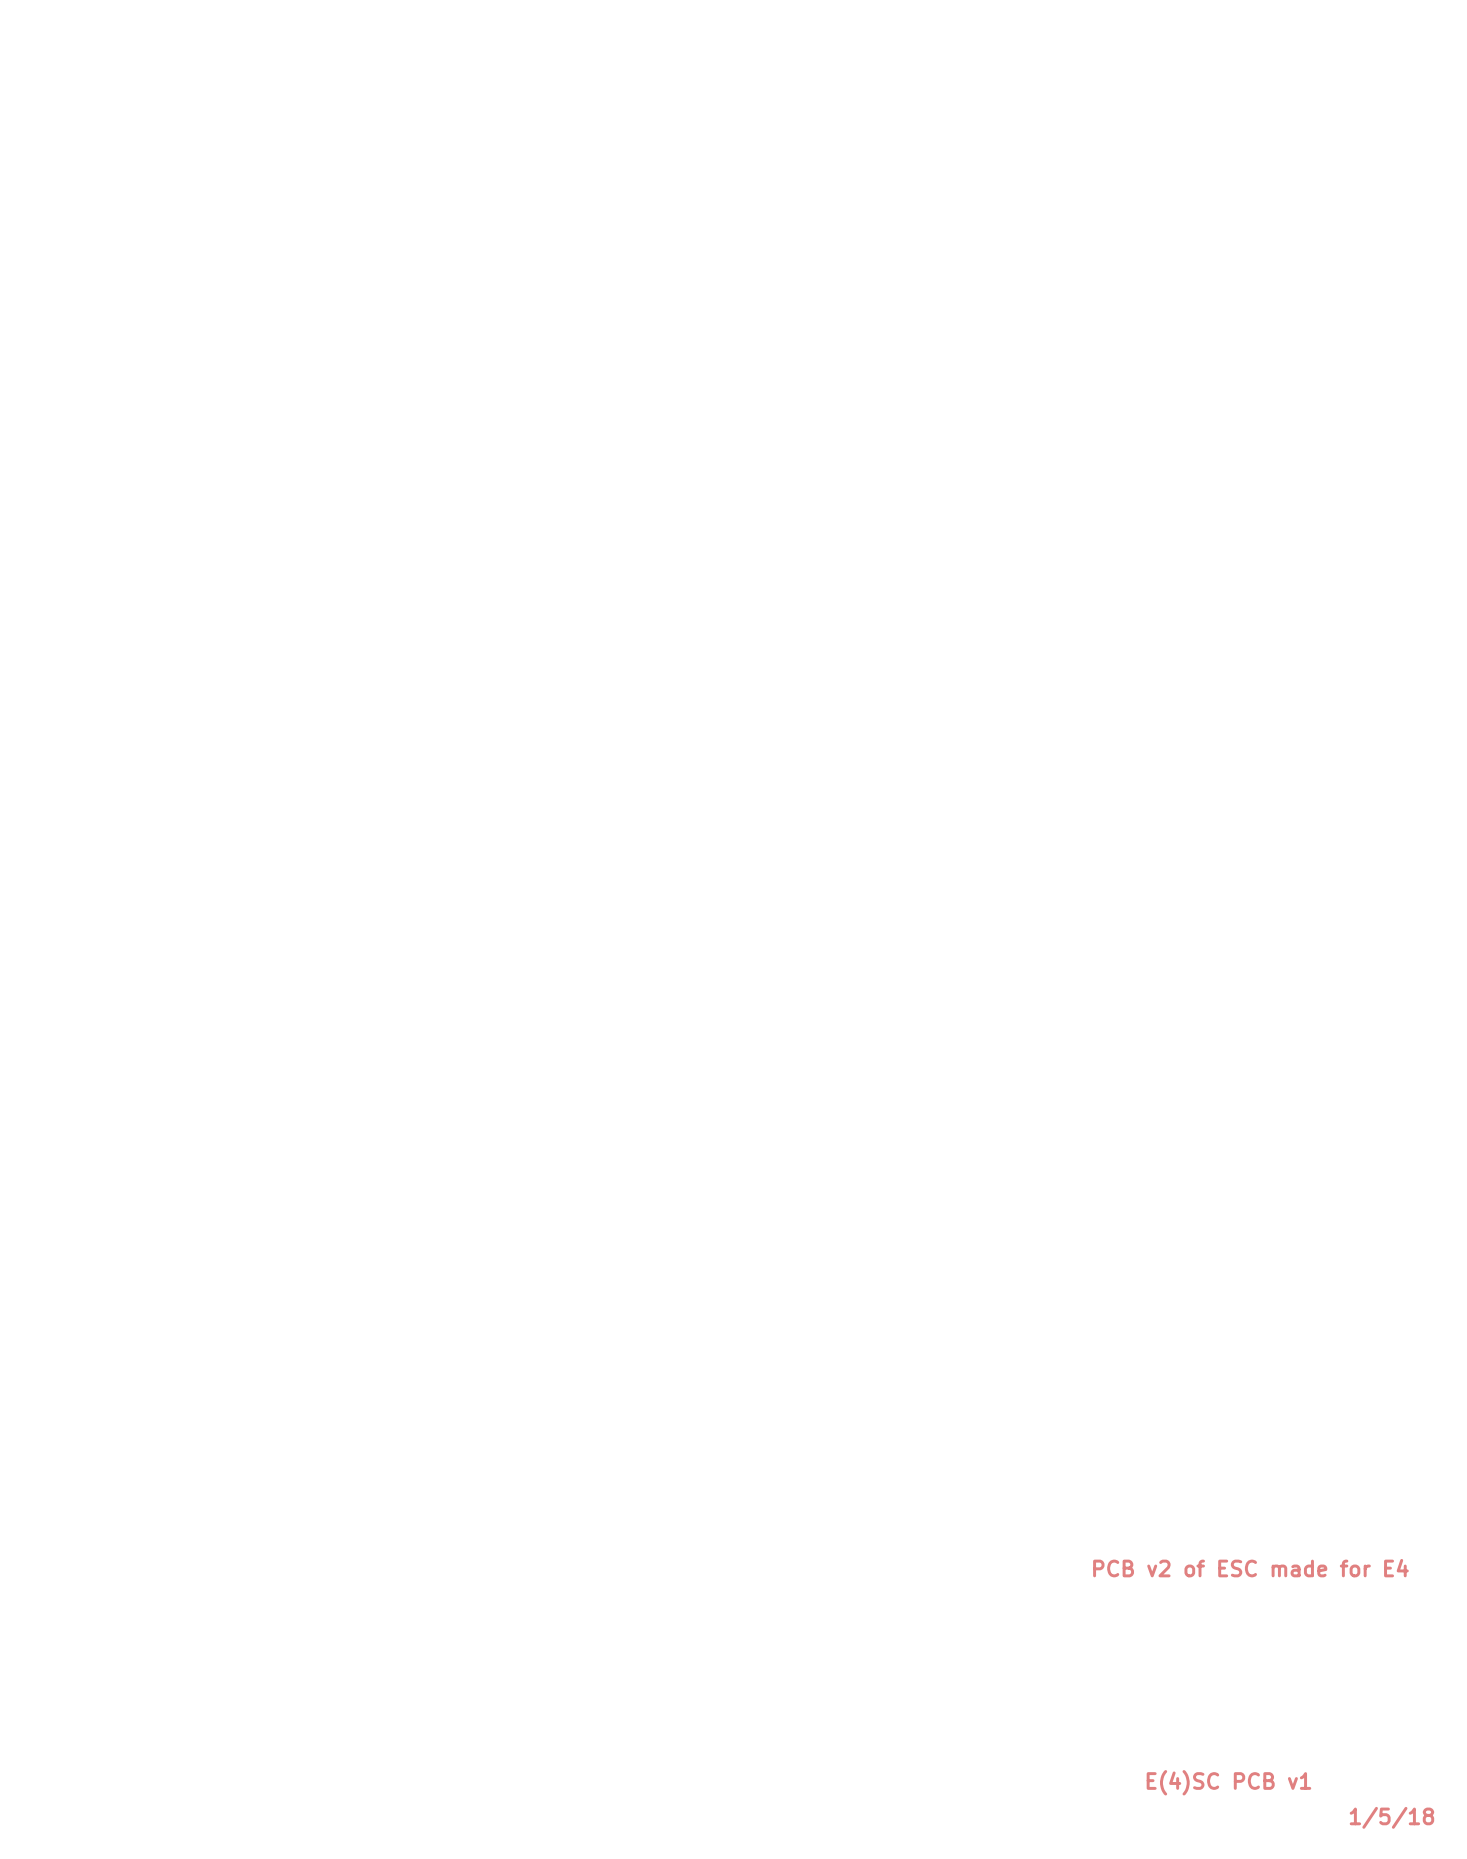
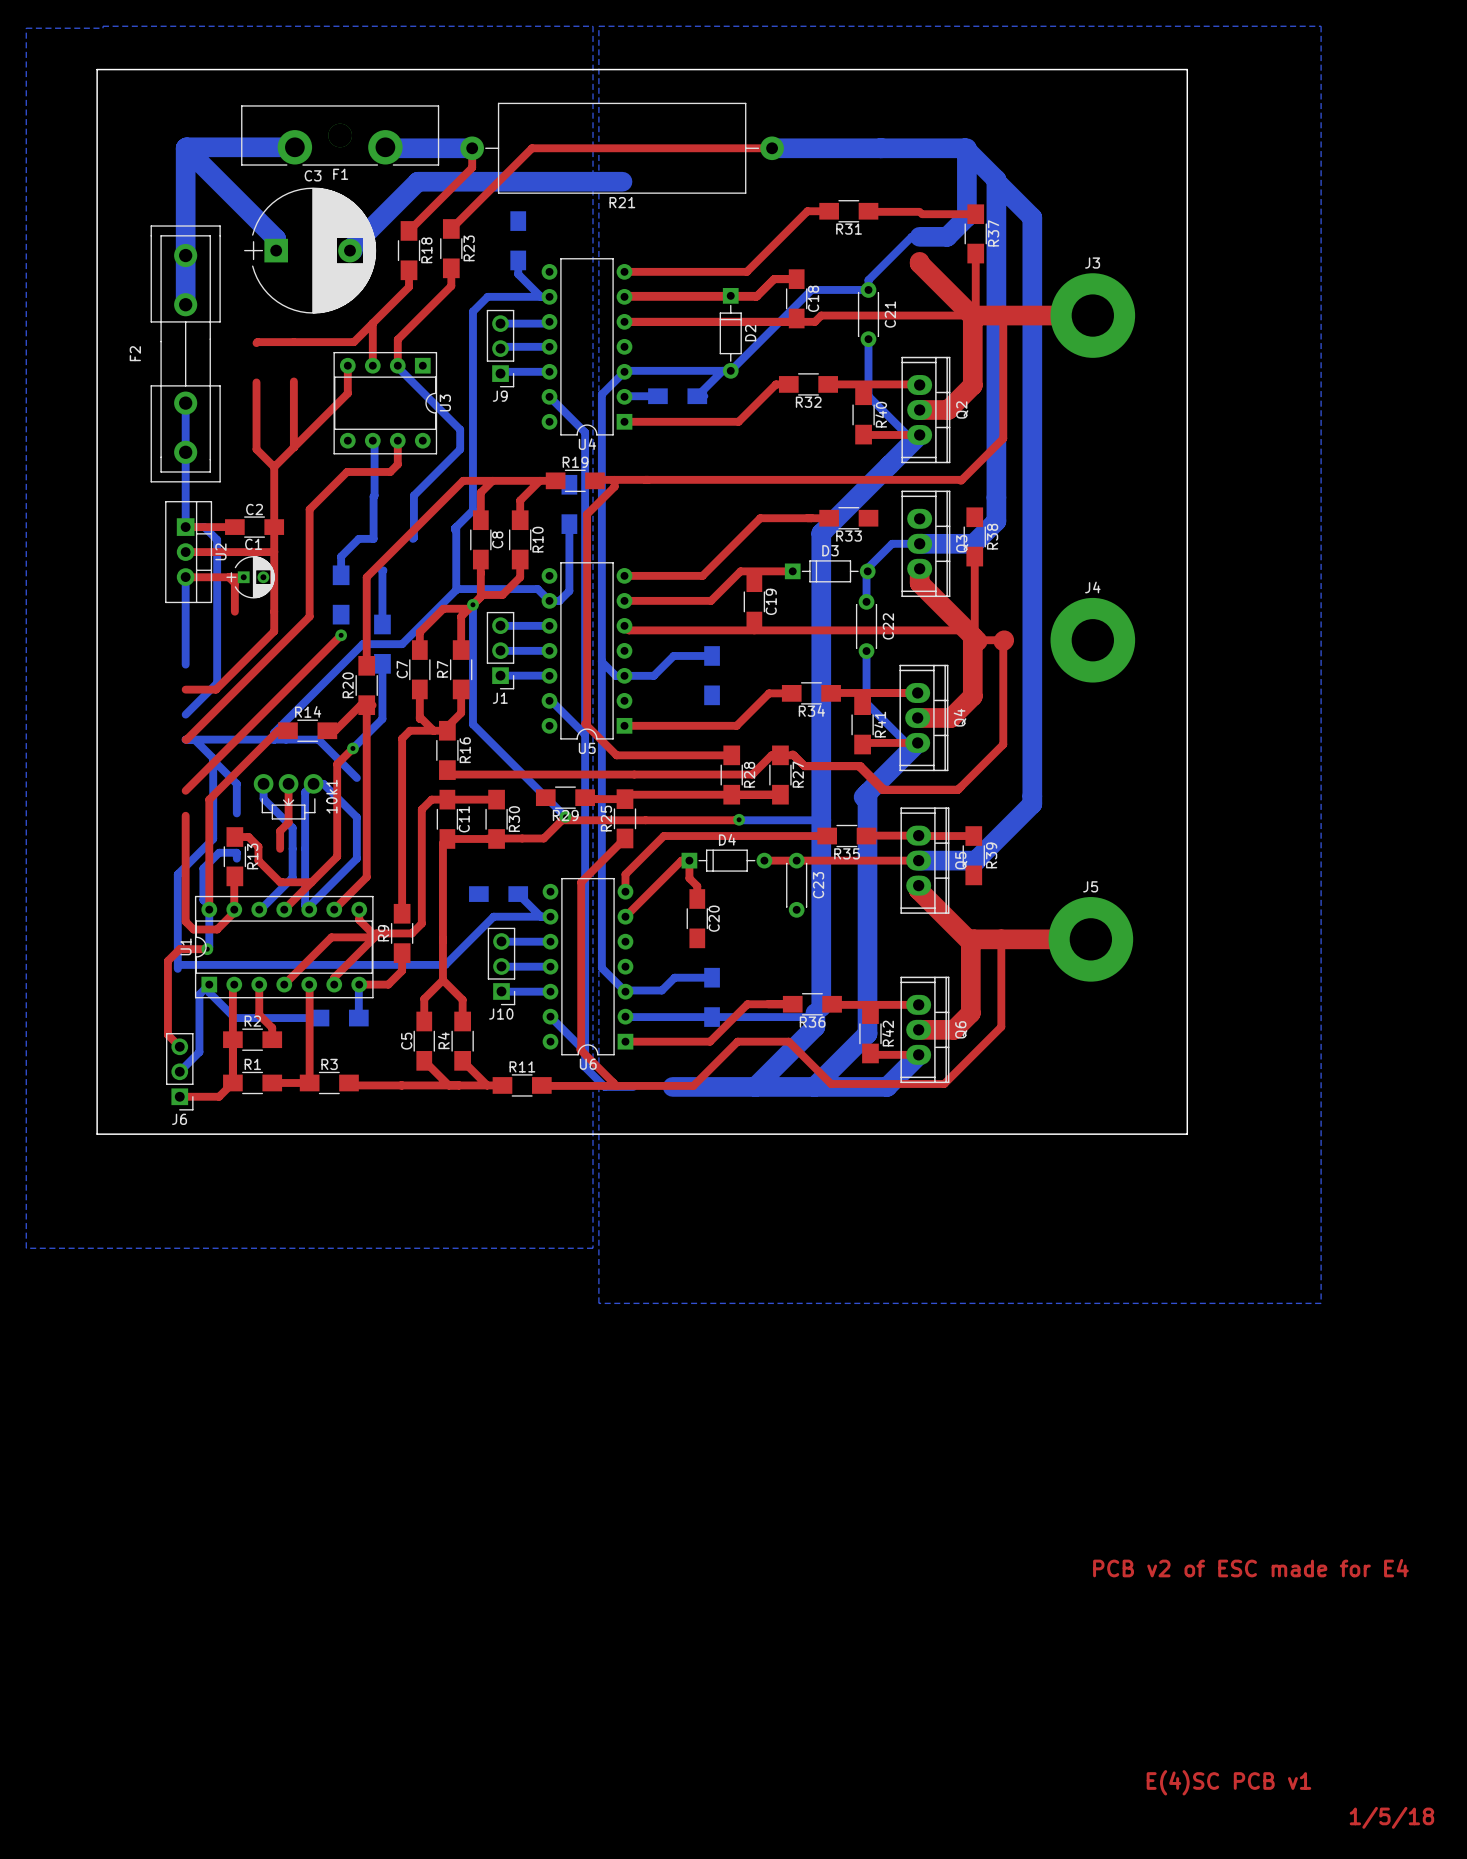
bottom zone outline: none -> (103, 26) (103, 28) (26, 28) (26, 1248) (593, 1248) (593, 26) (103, 26)
bottom zone outline: none -> (598, 26) (1321, 26) (1321, 1303) (598, 1303) (598, 26)
board edge: none -> (97, 69) (97, 1134) (1187, 1134) (1187, 69) (97, 69)
F1: none -> (340, 135)
bottom track: none -> (385, 147) (472, 148)
bottom track: none -> (185, 148) (276, 238) (276, 250)
bottom track: none -> (185, 148) (185, 304) (185, 255)
bottom track: none -> (185, 148) (293, 148)
top track: none -> (472, 148) (472, 167) (409, 230)
R21: none -> (622, 148)
top track: none -> (772, 148) (532, 148) (451, 228)
bottom track: none -> (772, 148) (964, 148) (996, 179) (996, 521) (973, 543) (919, 543)
bottom track: none -> (966, 148) (966, 217) (947, 236) (919, 236)
bottom track: none -> (622, 181) (417, 181) (349, 249) (352, 250)
bottom track: none -> (996, 181) (1032, 217) (1032, 804) (975, 860)
top track: none -> (829, 211) (807, 211) (746, 271) (624, 271)
R31: none -> (848, 211)
top track: none -> (869, 211) (975, 214)
R37: none -> (975, 233)
bottom track: none -> (919, 236) (911, 236) (868, 280) (868, 289)
part: none -> (518, 240)
R23: none -> (451, 248)
C3: none -> (310, 250)
R18: none -> (409, 250)
top track: none -> (975, 253) (975, 313) (973, 315)
bottom track: none -> (518, 260) (518, 274) (540, 296)
top track: none -> (919, 261) (972, 316)
top track: none -> (451, 268) (451, 286) (397, 339) (397, 365)
top track: none -> (409, 270) (409, 287) (372, 323) (372, 365)
top track: none -> (796, 279) (774, 279) (756, 296) (624, 296) (757, 295)
bottom track: none -> (868, 289) (811, 289) (730, 370) (625, 370) (601, 394) (601, 968) (625, 991) (661, 990) (674, 977) (712, 977)
bottom track: none -> (549, 296) (487, 296) (472, 311) (472, 510) (455, 530)
C18: none -> (796, 298)
C21: none -> (868, 314)
top track: none -> (973, 315) (821, 315) (814, 321) (624, 321)
top track: none -> (973, 315) (1092, 315)
top track: none -> (1003, 315) (1003, 438) (960, 480)
J3: none -> (1092, 315)
top track: none -> (972, 316) (972, 385) (948, 410) (919, 410)
bottom track: none -> (549, 321) (547, 323) (500, 323)
top track: none -> (372, 323) (353, 342) (256, 343)
D2: none -> (730, 333)
bottom track: none -> (868, 339) (868, 396) (907, 434)
bottom track: none -> (549, 346) (502, 346) (500, 348)
U4: none -> (587, 346)
J9: none -> (500, 348)
F2: none -> (185, 353)
top track: none -> (347, 365) (347, 393) (274, 467)
bottom track: none -> (397, 365) (460, 429) (460, 449) (413, 495) (412, 538)
bottom track: none -> (722, 370) (697, 396) (705, 396)
bottom track: none -> (549, 371) (502, 371) (500, 373)
top track: none -> (293, 381) (293, 447)
top track: none -> (256, 382) (256, 449) (274, 467)
top track: none -> (787, 384) (776, 384) (738, 421) (624, 421)
R32: none -> (808, 384)
top track: none -> (828, 385) (919, 385)
bottom track: none -> (549, 396) (585, 432) (585, 1067) (604, 1086) (633, 1086)
bottom track: none -> (625, 396) (657, 396)
part: none -> (677, 396)
bottom track: none -> (185, 403) (185, 527) (204, 527) (217, 539) (217, 683) (185, 714)
U3: none -> (385, 403)
Q2: none -> (925, 410)
R40: none -> (863, 414)
top track: none -> (863, 434) (919, 434)
bottom track: none -> (919, 434) (821, 533) (821, 1007) (811, 1017) (625, 1016)
bottom track: none -> (372, 440) (374, 442) (373, 538) (358, 538) (341, 556) (341, 575)
top track: none -> (397, 440) (397, 464) (390, 471) (347, 471) (309, 509) (309, 616) (185, 739)
top track: none -> (274, 467) (274, 631) (215, 689) (185, 689)
top track: none -> (614, 479) (614, 486) (587, 514) (587, 721) (585, 723)
top track: none -> (961, 479) (594, 480)
top track: none -> (492, 480) (480, 492) (480, 520)
top track: none -> (539, 480) (520, 500) (520, 520)
top track: none -> (555, 480) (463, 480) (366, 577) (366, 665)
R19: none -> (575, 480)
part: none -> (569, 504)
top track: none -> (829, 518) (760, 518) (702, 575) (624, 575)
R33: none -> (848, 518)
bottom track: none -> (569, 524) (569, 591) (559, 600) (549, 600) (537, 589) (457, 589) (402, 644) (362, 644) (274, 732) (274, 739)
top track: none -> (185, 527) (234, 527)
C2: none -> (254, 527)
bottom track: none -> (456, 527) (456, 590)
R38: none -> (974, 536)
C8: none -> (480, 539)
R10: none -> (520, 539)
bottom track: none -> (919, 543) (892, 543) (866, 569) (866, 601)
Q3: none -> (925, 543)
top track: none -> (273, 551) (185, 552)
U2: none -> (188, 552)
top track: none -> (974, 556) (974, 638)
top track: none -> (480, 559) (480, 596)
top track: none -> (520, 559) (520, 577) (502, 594) (482, 594) (461, 616) (461, 650)
top track: none -> (919, 568) (919, 583) (977, 641)
bottom track: none -> (383, 570) (382, 624)
top track: none -> (792, 571) (740, 571) (711, 600) (624, 600)
D3: none -> (830, 571)
top track: none -> (185, 577) (243, 577)
bottom track: none -> (185, 577) (185, 664)
top track: none -> (228, 577) (234, 583) (234, 611)
C1: none -> (250, 577)
part: none -> (341, 594)
C19: none -> (754, 601)
bottom track: none -> (472, 604) (472, 724) (565, 816)
via: none -> (472, 604)
top track: none -> (469, 608) (443, 608) (419, 632) (419, 650)
bottom track: none -> (500, 625) (549, 625)
top track: none -> (625, 626) (629, 630) (974, 630)
C22: none -> (866, 626)
top track: none -> (341, 635) (185, 790)
via: none -> (341, 635)
top track: none -> (972, 636) (972, 696) (951, 717) (917, 717)
top track: none -> (976, 640) (1004, 640) (1003, 744) (958, 789) (882, 789) (858, 766)
J4: none -> (1092, 640)
part: none -> (382, 644)
bottom track: none -> (500, 650) (549, 650)
J1: none -> (500, 650)
U5: none -> (587, 650)
bottom track: none -> (866, 651) (866, 703) (906, 742)
bottom track: none -> (712, 655) (673, 655) (653, 675) (615, 675) (601, 661)
bottom track: none -> (382, 663) (382, 718) (352, 748)
C7: none -> (419, 669)
R7: none -> (461, 669)
bottom track: none -> (500, 675) (549, 675)
part: none -> (712, 675)
R20: none -> (366, 685)
top track: none -> (419, 689) (419, 718)
top track: none -> (461, 689) (461, 713) (447, 726) (447, 730) (410, 730) (402, 738) (402, 913)
top track: none -> (831, 692) (917, 692)
top track: none -> (785, 693) (791, 693) (769, 693) (736, 725) (624, 725)
R34: none -> (811, 693)
bottom track: none -> (549, 700) (585, 734)
top track: none -> (366, 705) (366, 877) (334, 909)
top track: none -> (372, 705) (360, 705) (335, 730) (327, 730)
top track: none -> (419, 716) (433, 730)
Q4: none -> (923, 717)
top track: none -> (585, 724) (616, 755) (731, 755)
R41: none -> (862, 724)
top track: none -> (287, 730) (278, 730) (209, 799) (209, 909)
R14: none -> (307, 730)
bottom track: none -> (185, 739) (318, 739) (356, 777)
bottom track: none -> (194, 739) (213, 758) (213, 838) (177, 874) (177, 968)
bottom track: none -> (917, 742) (863, 797)
top track: none -> (862, 744) (864, 742) (917, 742) (916, 744)
top track: none -> (352, 748) (337, 764) (337, 856) (284, 909)
via: none -> (352, 748)
R16: none -> (447, 750)
top track: none -> (792, 754) (804, 766) (860, 766) (884, 789)
top track: none -> (793, 755) (771, 755) (752, 774) (454, 774)
bottom track: none -> (213, 762) (236, 783) (236, 813)
R28: none -> (731, 775)
R27: none -> (780, 775)
bottom track: none -> (263, 783) (263, 798) (292, 827) (292, 877) (259, 909)
top track: none -> (288, 783) (288, 822) (280, 831) (280, 848)
bottom track: none -> (313, 783) (323, 783) (356, 817) (356, 858) (309, 906) (309, 909) (305, 905) (305, 792) (313, 783)
bottom track: none -> (867, 793) (867, 1033) (814, 1086)
top track: none -> (780, 794) (629, 794) (624, 799) (585, 797)
10k1: none -> (288, 796)
R29: none -> (565, 797)
top track: none -> (496, 799) (431, 799) (421, 809) (421, 923) (411, 933) (376, 933) (372, 937)
top track: none -> (185, 815) (185, 921) (193, 929) (217, 929) (234, 912) (234, 882)
top track: none -> (565, 816) (543, 838) (488, 838)
via: none -> (565, 816)
R25: none -> (624, 818)
C11: none -> (447, 819)
R30: none -> (496, 819)
top track: none -> (739, 819) (562, 820)
bottom track: none -> (739, 819) (821, 820)
via: none -> (739, 819)
top track: none -> (827, 836) (663, 836) (625, 874) (625, 892)
R35: none -> (846, 836)
top track: none -> (866, 836) (973, 836)
top track: none -> (234, 837) (248, 837) (258, 846) (258, 860) (280, 882) (311, 882)
top track: none -> (496, 838) (447, 838) (442, 843) (442, 980)
top track: none -> (624, 838) (581, 882) (581, 1050)
R39: none -> (973, 855)
R13: none -> (234, 856)
bottom track: none -> (236, 858) (236, 852) (219, 852) (203, 868) (203, 899) (209, 905) (209, 947) (207, 949)
D4: none -> (726, 860)
top track: none -> (764, 860) (918, 860)
bottom track: none -> (918, 860) (976, 860)
Q5: none -> (924, 860)
C23: none -> (796, 885)
top track: none -> (918, 885) (918, 890) (970, 942)
part: none -> (498, 894)
bottom track: none -> (518, 894) (540, 916)
top track: none -> (697, 899) (697, 886) (689, 878) (689, 860) (681, 860) (625, 916)
top track: none -> (359, 909) (359, 920) (375, 934)
bottom track: none -> (550, 916) (493, 916) (445, 964) (179, 964)
C20: none -> (697, 918)
R9: none -> (402, 933)
top track: none -> (1001, 939) (1001, 1026) (944, 1083) (831, 1083) (788, 1041) (737, 1041) (693, 1085) (541, 1085)
top track: none -> (1090, 939) (973, 939) (970, 942)
J5: none -> (1090, 939)
bottom track: none -> (501, 941) (550, 941)
top track: none -> (970, 942) (970, 1013) (954, 1029) (918, 1029)
U1: none -> (284, 947)
top track: none -> (207, 949) (179, 949) (167, 960) (167, 1034) (179, 1046)
via: none -> (207, 949)
top track: none -> (402, 953) (402, 970) (388, 984) (359, 984)
bottom track: none -> (501, 966) (550, 966)
J10: none -> (501, 966)
U6: none -> (587, 966)
top track: none -> (442, 980) (424, 998) (424, 1021)
top track: none -> (442, 980) (462, 999) (462, 1021)
top track: none -> (234, 984) (232, 1082) (219, 1096) (179, 1096)
top track: none -> (259, 984) (259, 1014) (272, 1027) (272, 1039)
top track: none -> (284, 984) (331, 937) (374, 937) (334, 977) (334, 984)
top track: none -> (309, 984) (309, 1082) (272, 1082)
bottom track: none -> (359, 984) (358, 1018)
bottom track: none -> (501, 991) (550, 991)
part: none -> (712, 997)
top track: none -> (792, 1004) (747, 1004) (710, 1041) (625, 1041)
R36: none -> (812, 1004)
top track: none -> (832, 1004) (918, 1004)
bottom track: none -> (815, 1013) (815, 1026) (755, 1086)
bottom track: none -> (550, 1016) (585, 1051)
bottom track: none -> (319, 1018) (234, 1018) (209, 992) (209, 984) (199, 994) (199, 1052) (179, 1071)
part: none -> (339, 1018)
Q6: none -> (924, 1029)
R42: none -> (870, 1033)
R2: none -> (252, 1039)
C5: none -> (424, 1041)
R4: none -> (462, 1041)
top track: none -> (580, 1049) (616, 1085)
top track: none -> (870, 1053) (918, 1054)
bottom track: none -> (918, 1054) (887, 1086) (672, 1086)
top track: none -> (424, 1060) (448, 1085)
top track: none -> (462, 1060) (487, 1085)
J6: none -> (179, 1071)
R1: none -> (252, 1082)
R3: none -> (329, 1082)
top track: none -> (349, 1082) (351, 1085) (502, 1085)
R11: none -> (522, 1085)

